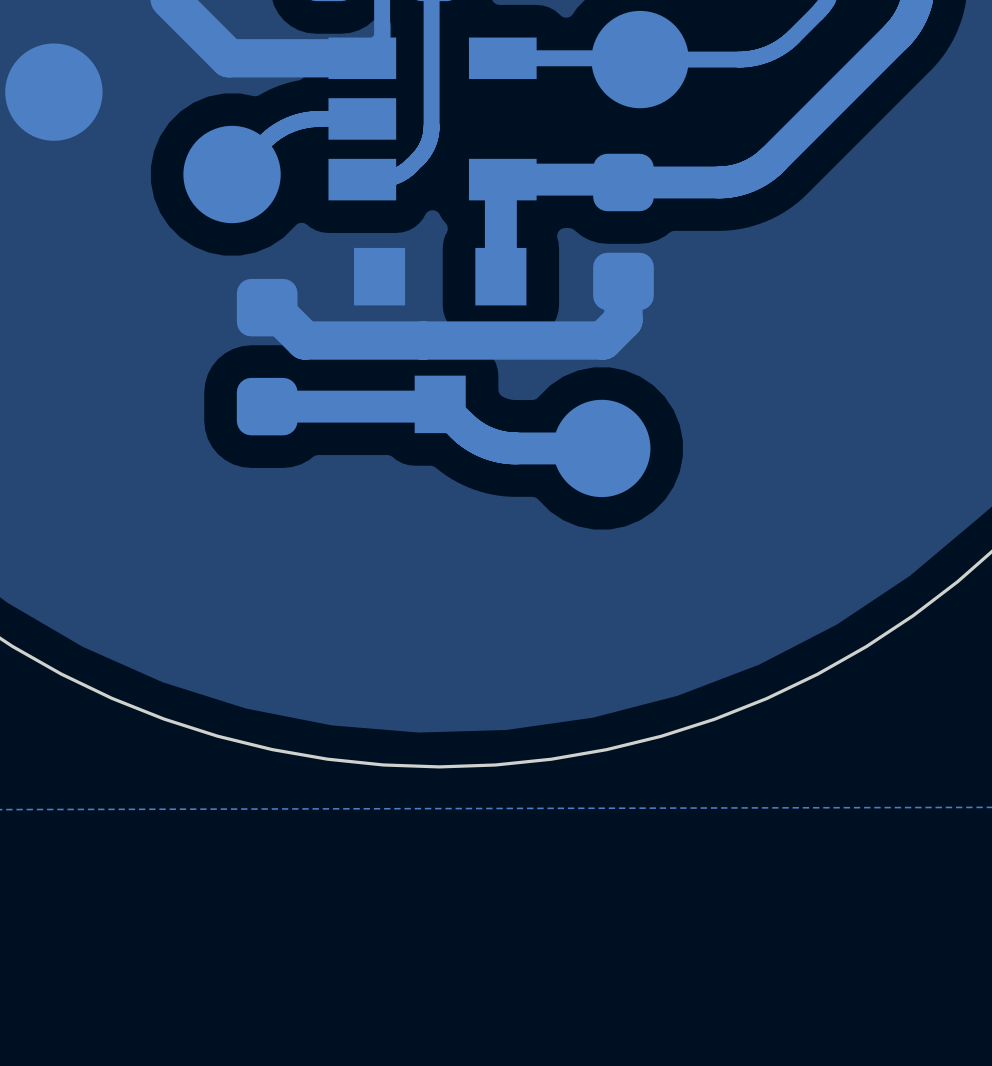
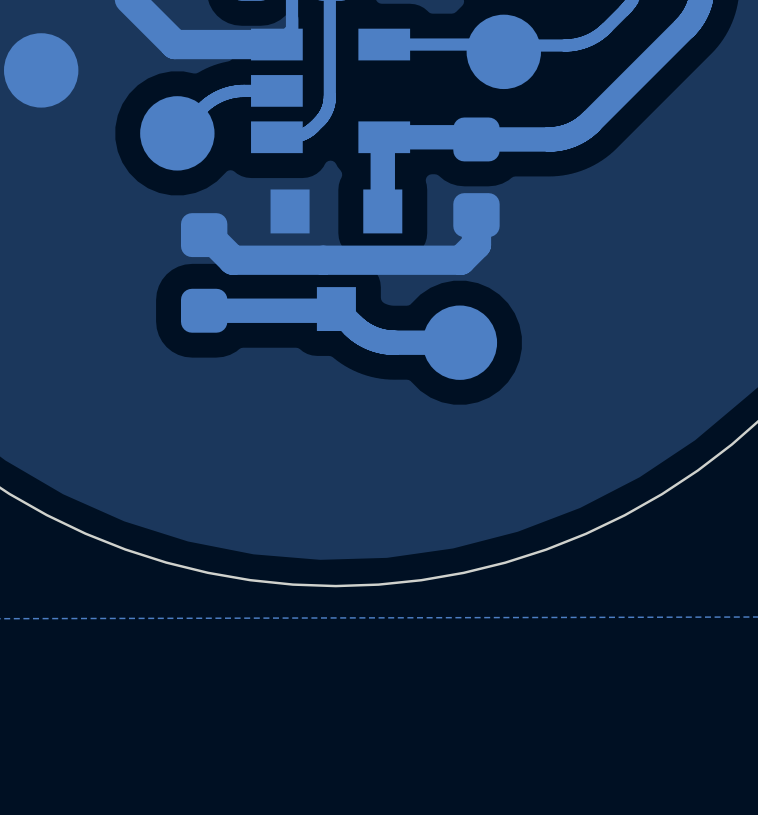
part position: (640, 59) -> (503, 51)

